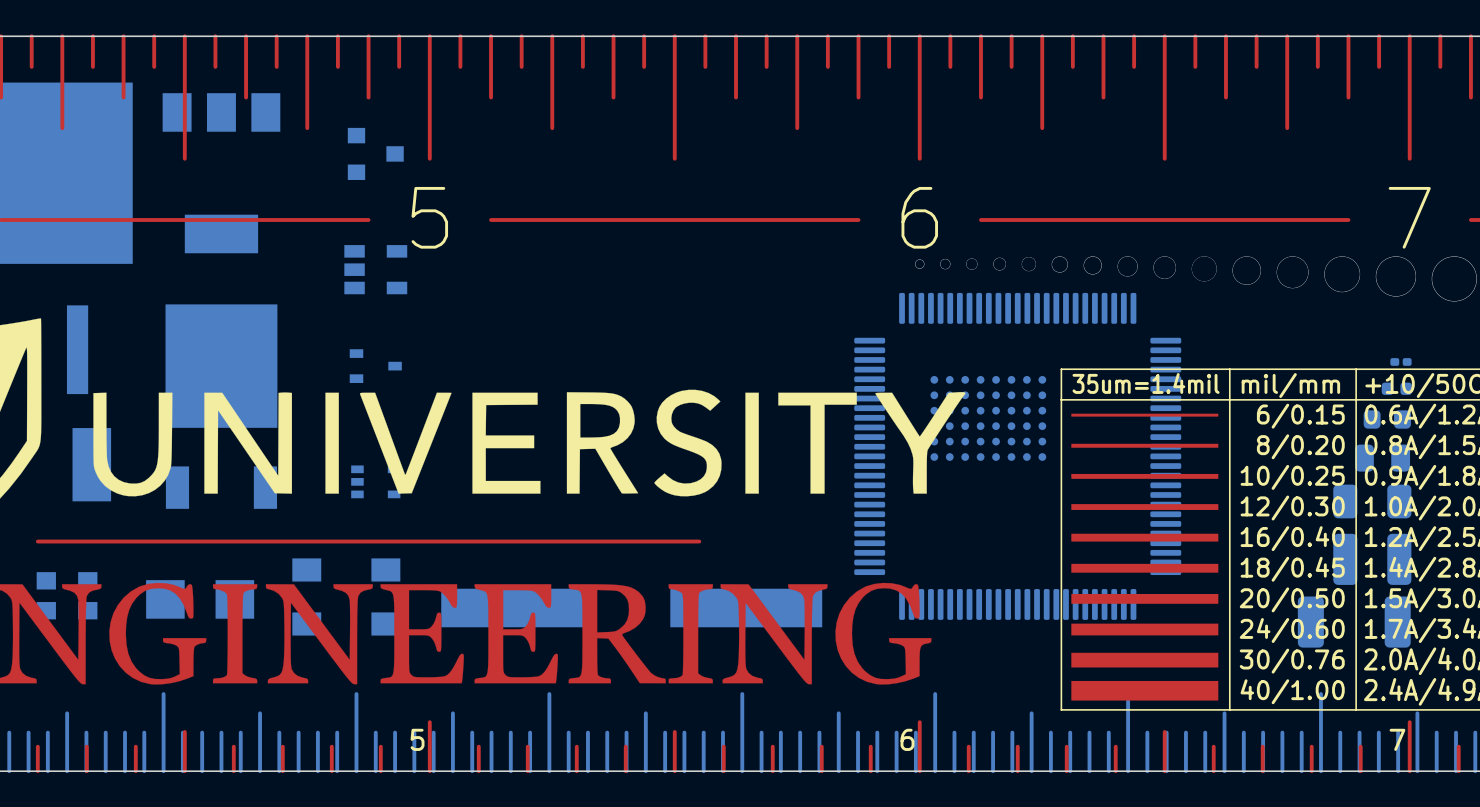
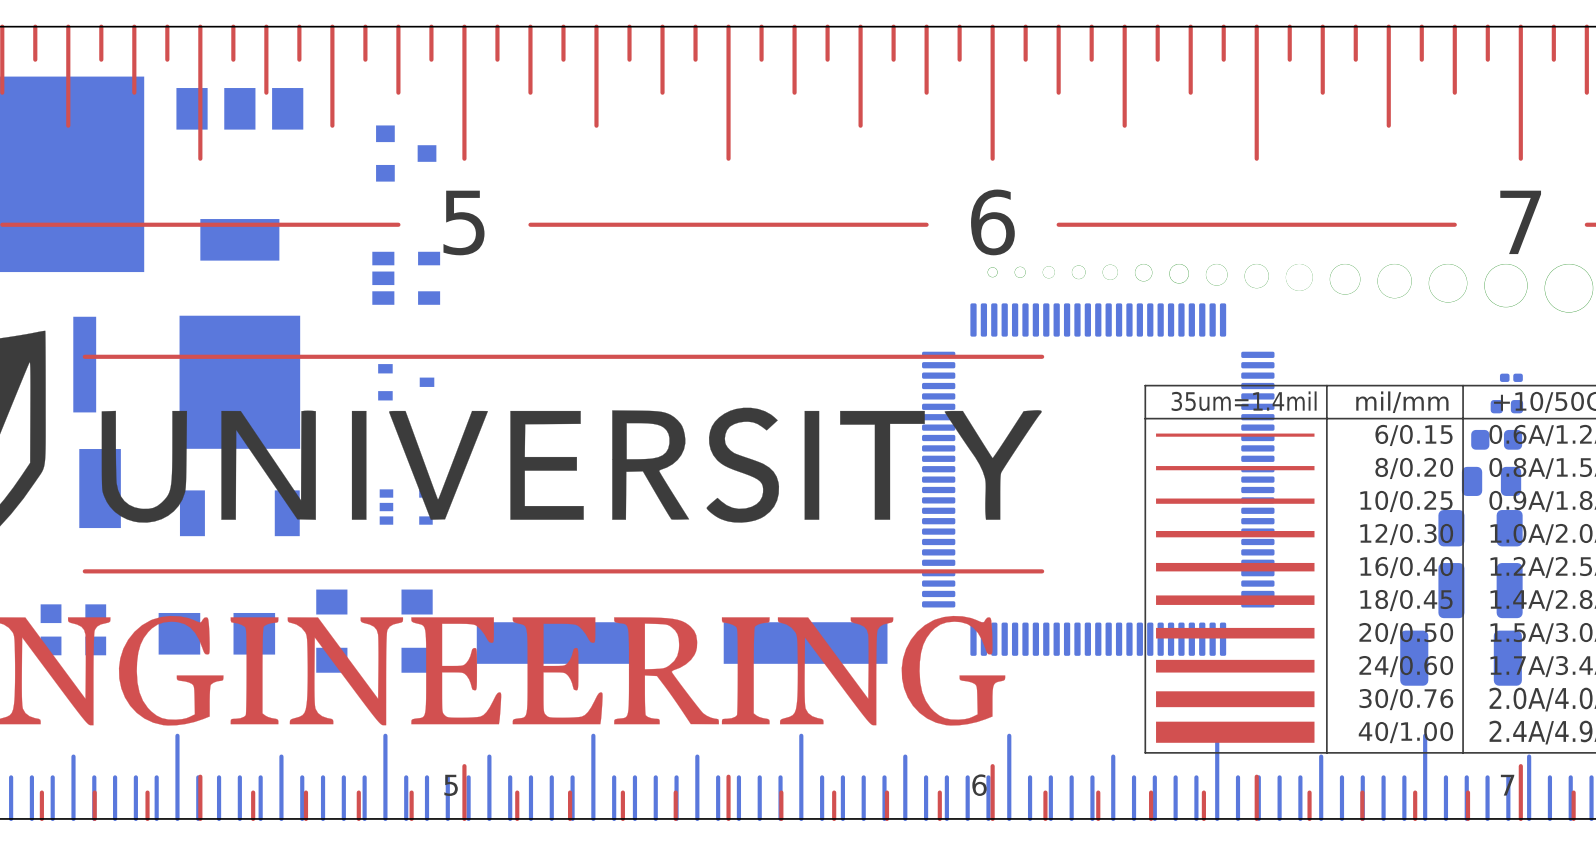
top track: none -> (84, 356) (1042, 356)
part: (988, 418) -> none
top track: (37, 541) (77, 541) -> none
top track: none -> (754, 571) (1042, 571)

